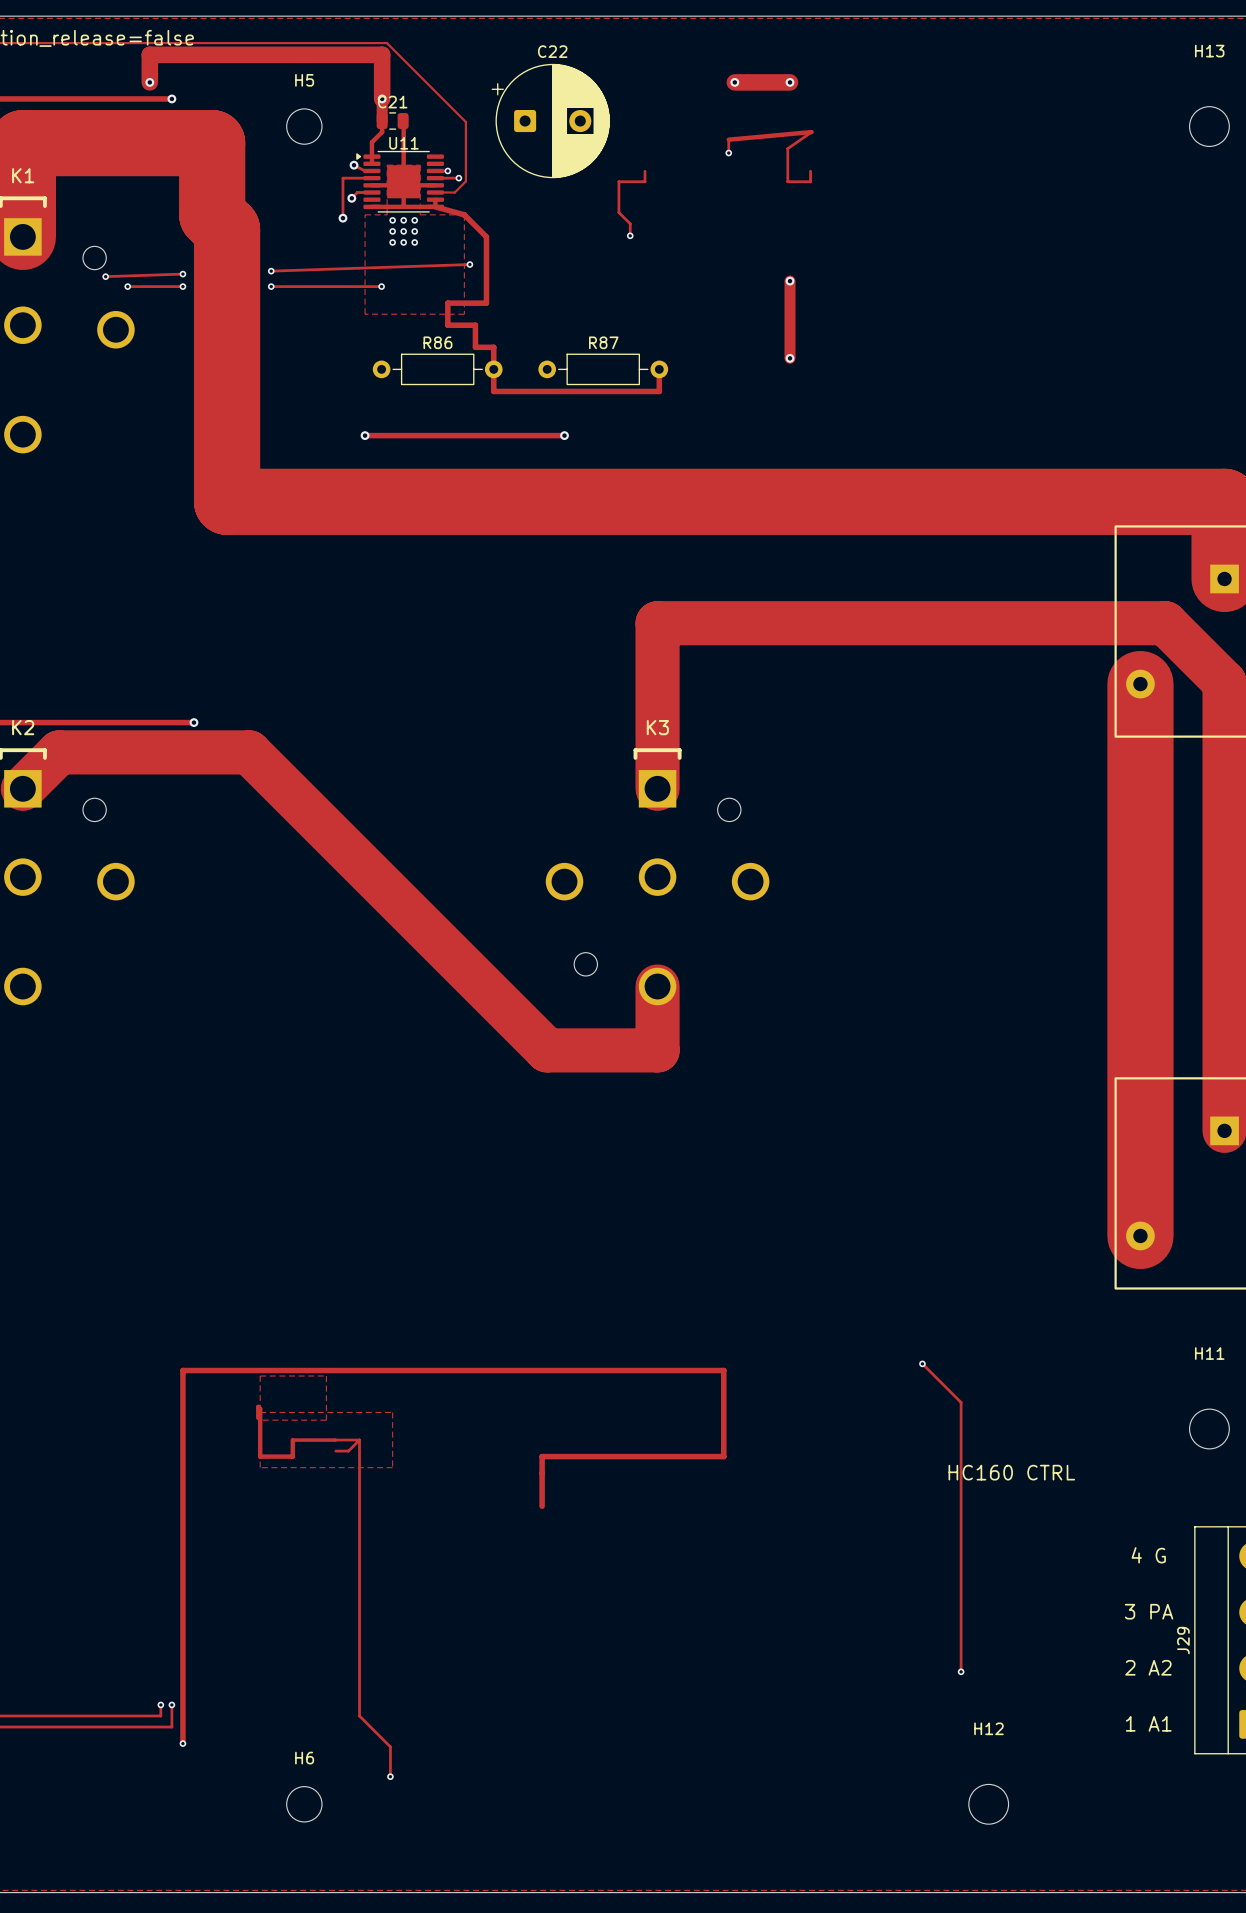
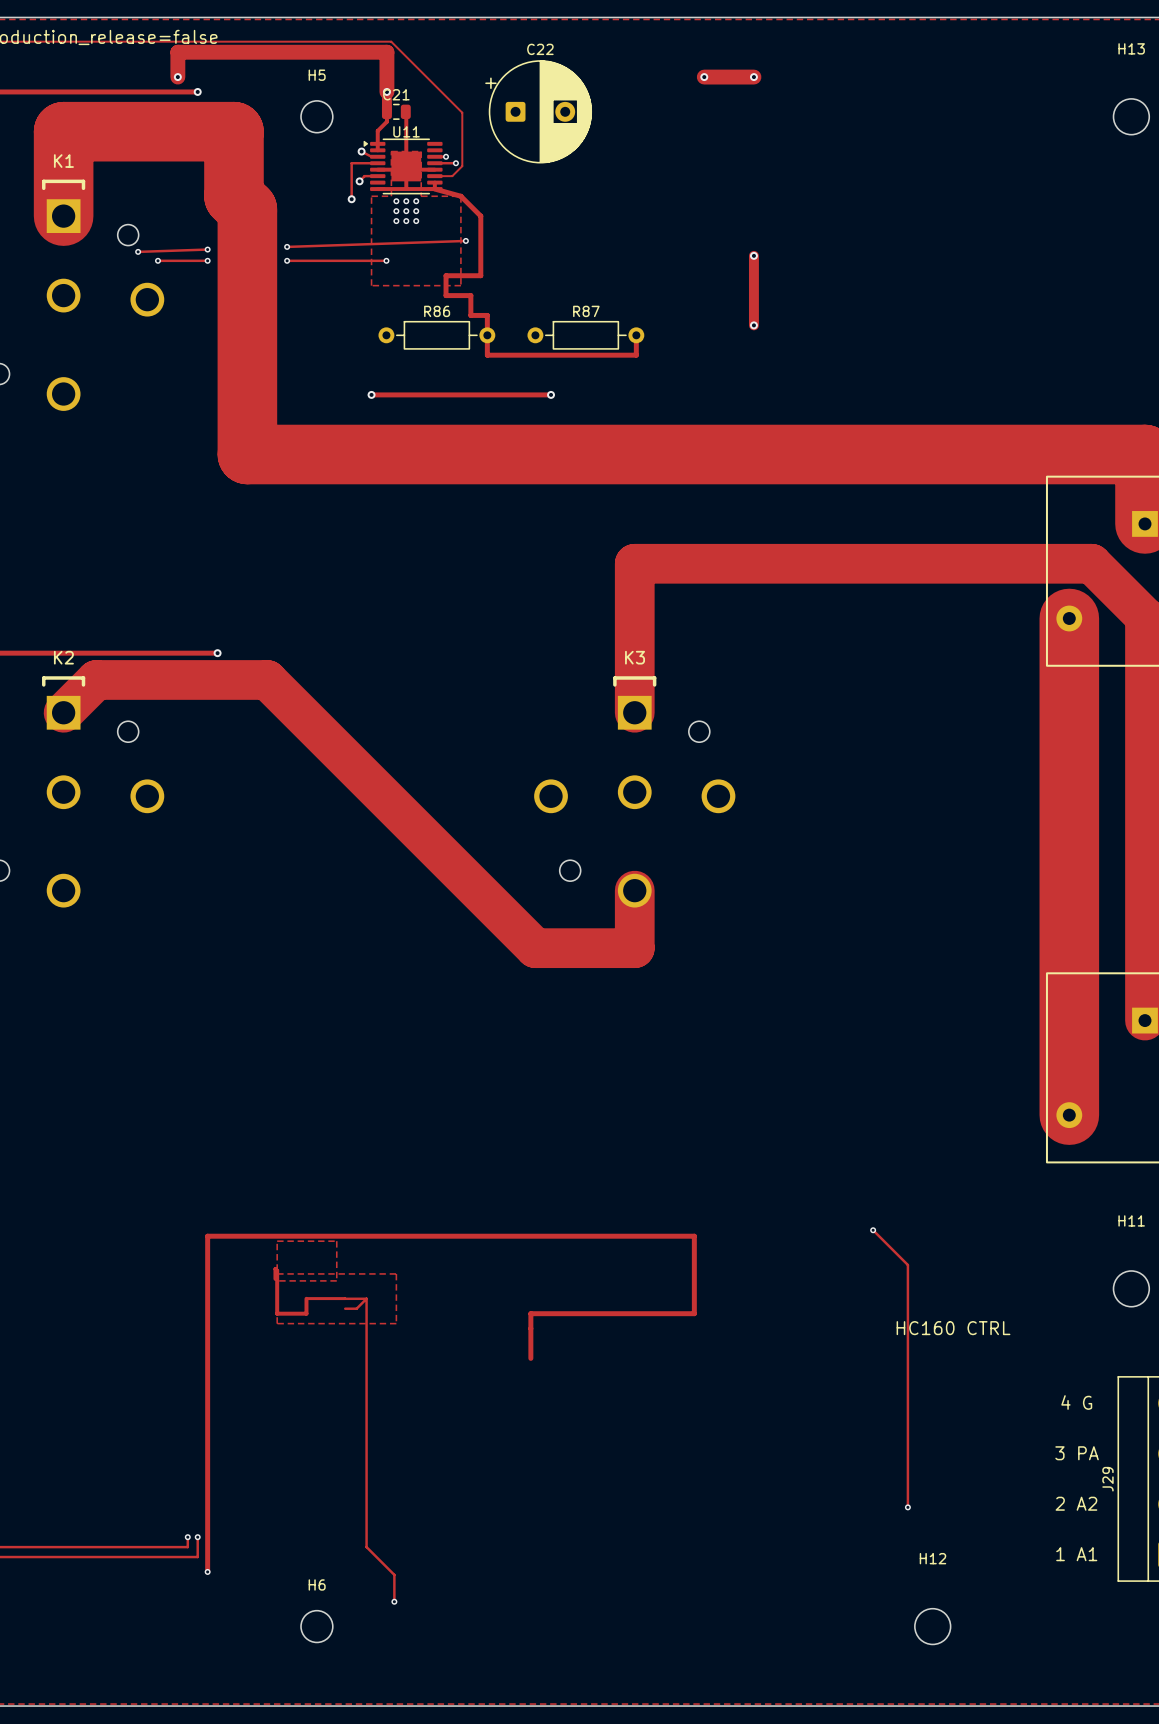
track: (728, 153) (728, 139) (811, 132) (787, 148) (787, 181) (810, 181) (810, 171) -> none
via: (728, 153) -> none
track: (645, 171) (645, 181) (618, 181) (618, 212) (630, 223) (630, 235) -> none
via: (630, 235) -> none

